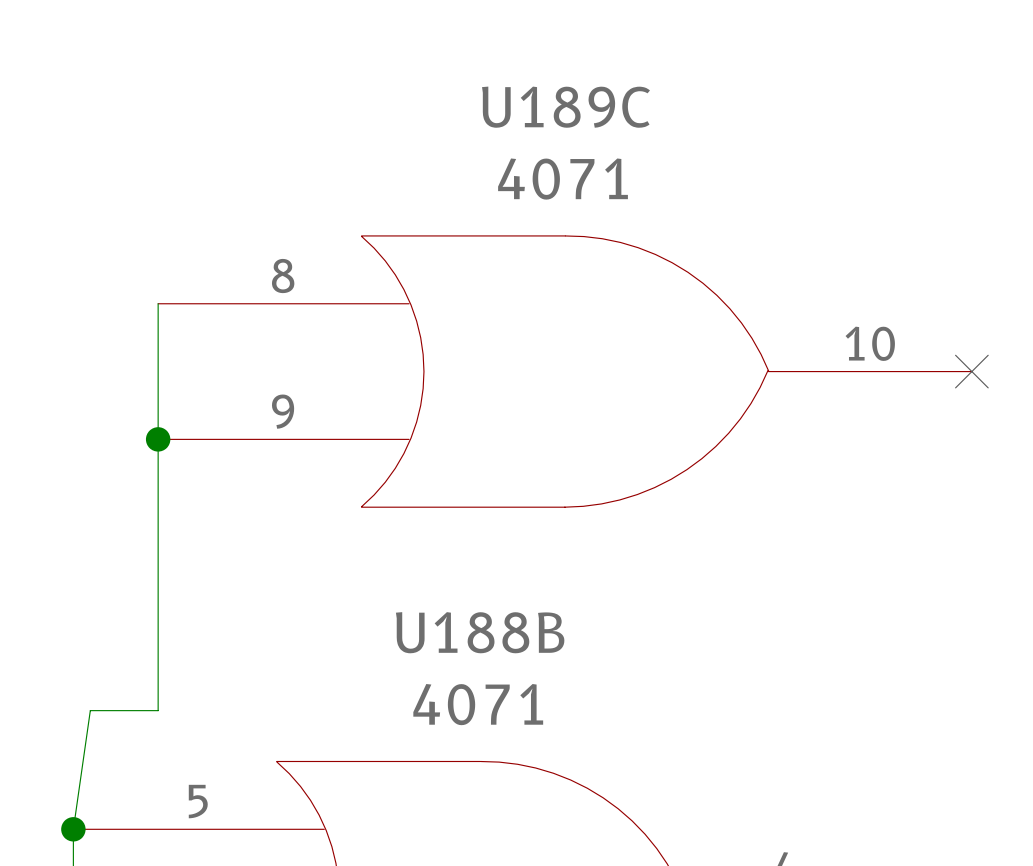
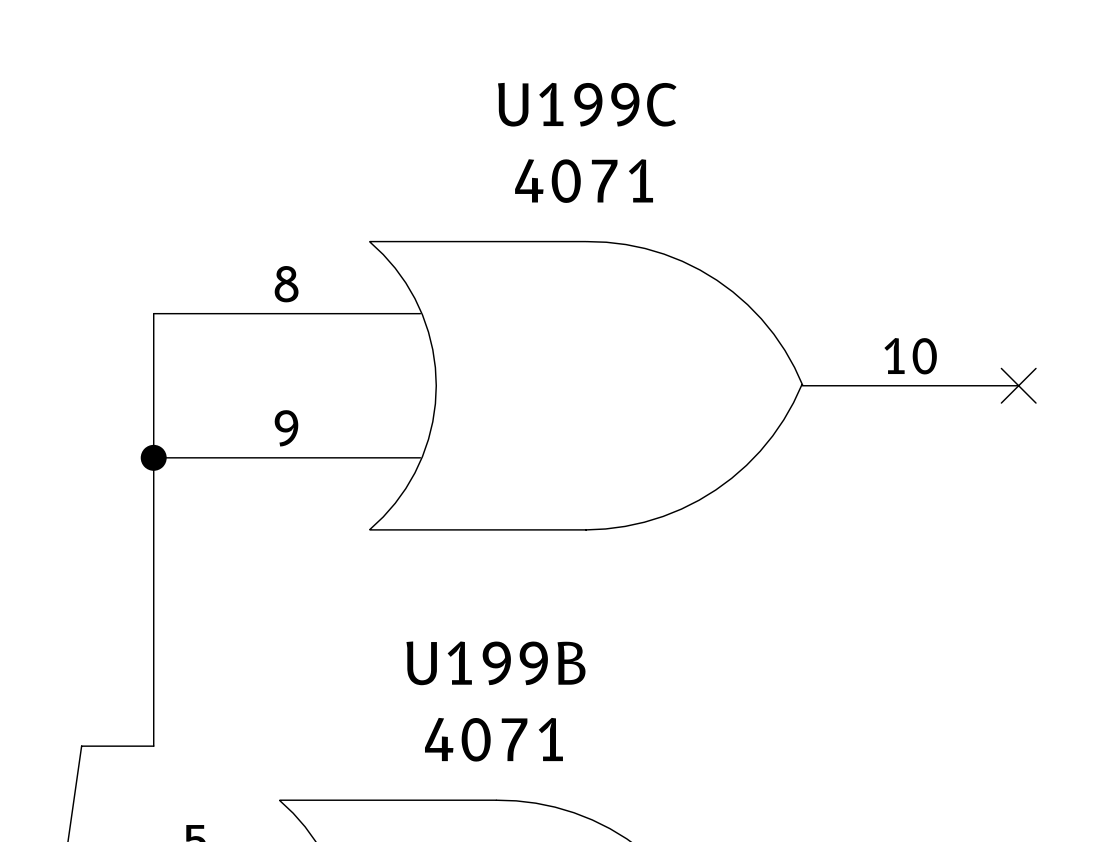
U189C name: U189C (565, 107) -> U199C (587, 104)
U188B name: U188B (480, 632) -> U199B (495, 663)

